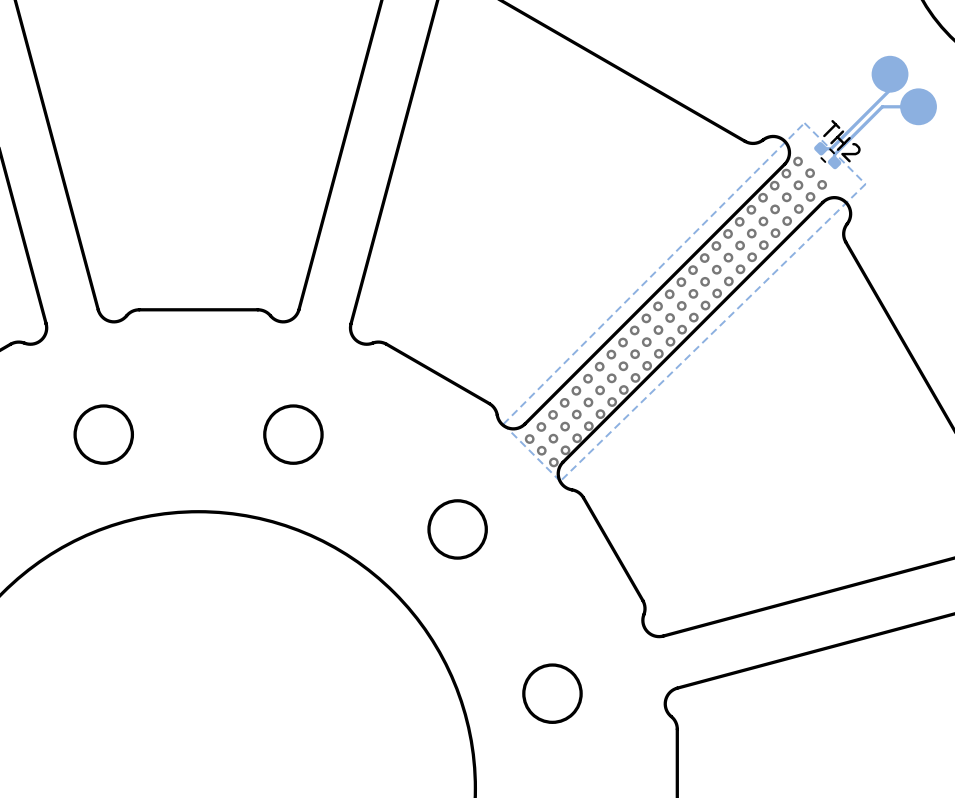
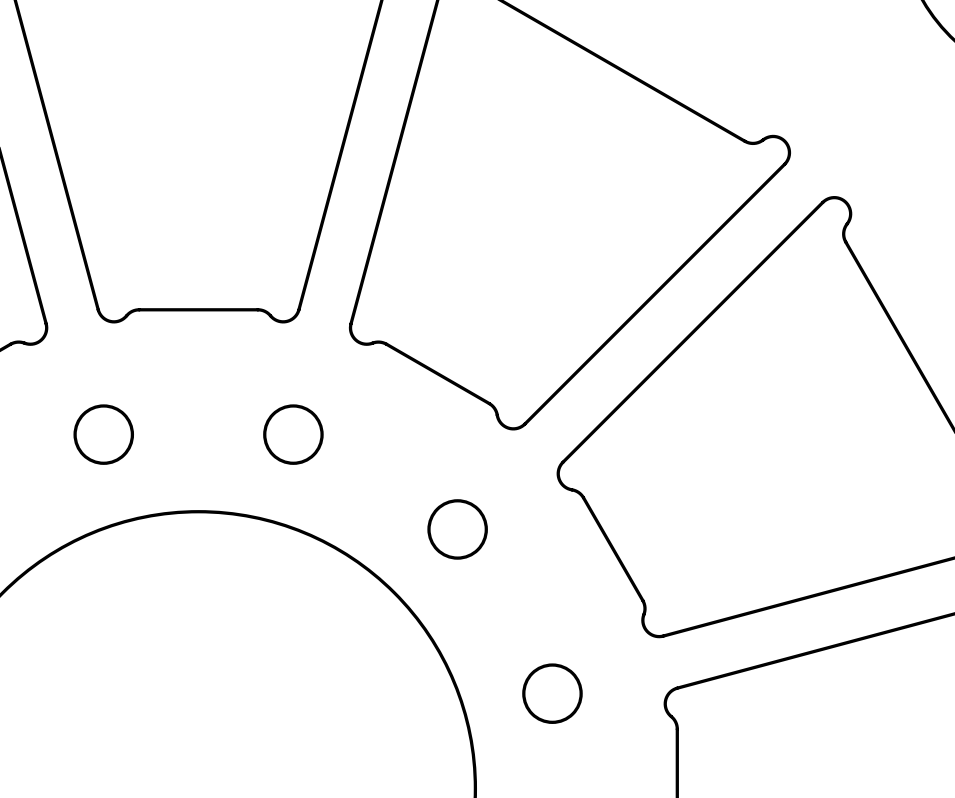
drawing: [871, 55, 937, 126] -> none
track: (890, 74) (890, 89) (831, 148) (820, 148) -> none
track: (918, 106) (882, 106) (834, 154) (834, 162) -> none
zone outline: (804, 123) (865, 184) (560, 481) (503, 424) (804, 123) -> none
TH2: (827, 155) -> none
via: (798, 161) -> none
via: (786, 173) -> none
via: (810, 173) -> none
via: (822, 184) -> none
via: (774, 185) -> none
via: (798, 185) -> none
via: (810, 196) -> none
via: (763, 197) -> none
via: (786, 197) -> none
via: (751, 209) -> none
via: (775, 209) -> none
via: (798, 209) -> none
via: (739, 221) -> none
via: (763, 221) -> none
via: (787, 221) -> none
via: (728, 233) -> none
via: (751, 233) -> none
via: (775, 233) -> none
via: (740, 245) -> none
via: (763, 245) -> none
via: (716, 246) -> none
via: (728, 257) -> none
via: (752, 257) -> none
via: (704, 258) -> none
via: (716, 269) -> none
via: (740, 269) -> none
via: (693, 270) -> none
via: (705, 281) -> none
via: (728, 281) -> none
via: (681, 282) -> none
via: (693, 293) -> none
via: (717, 293) -> none
via: (669, 294) -> none
via: (681, 305) -> none
via: (705, 305) -> none
via: (658, 306) -> none
via: (670, 317) -> none
via: (693, 317) -> none
via: (646, 318) -> none
via: (682, 329) -> none
via: (634, 330) -> none
via: (658, 330) -> none
via: (670, 341) -> none
via: (623, 342) -> none
via: (646, 342) -> none
via: (658, 353) -> none
via: (611, 354) -> none
via: (635, 354) -> none
via: (647, 365) -> none
via: (599, 366) -> none
via: (623, 366) -> none
via: (635, 377) -> none
via: (588, 378) -> none
via: (611, 378) -> none
via: (623, 389) -> none
via: (576, 390) -> none
via: (600, 390) -> none
via: (564, 402) -> none
via: (588, 402) -> none
via: (612, 402) -> none
via: (553, 414) -> none
via: (576, 414) -> none
via: (600, 414) -> none
via: (541, 426) -> none
via: (565, 426) -> none
via: (588, 426) -> none
via: (553, 438) -> none
via: (577, 438) -> none
via: (529, 439) -> none
via: (541, 450) -> none
via: (565, 450) -> none
via: (553, 462) -> none

